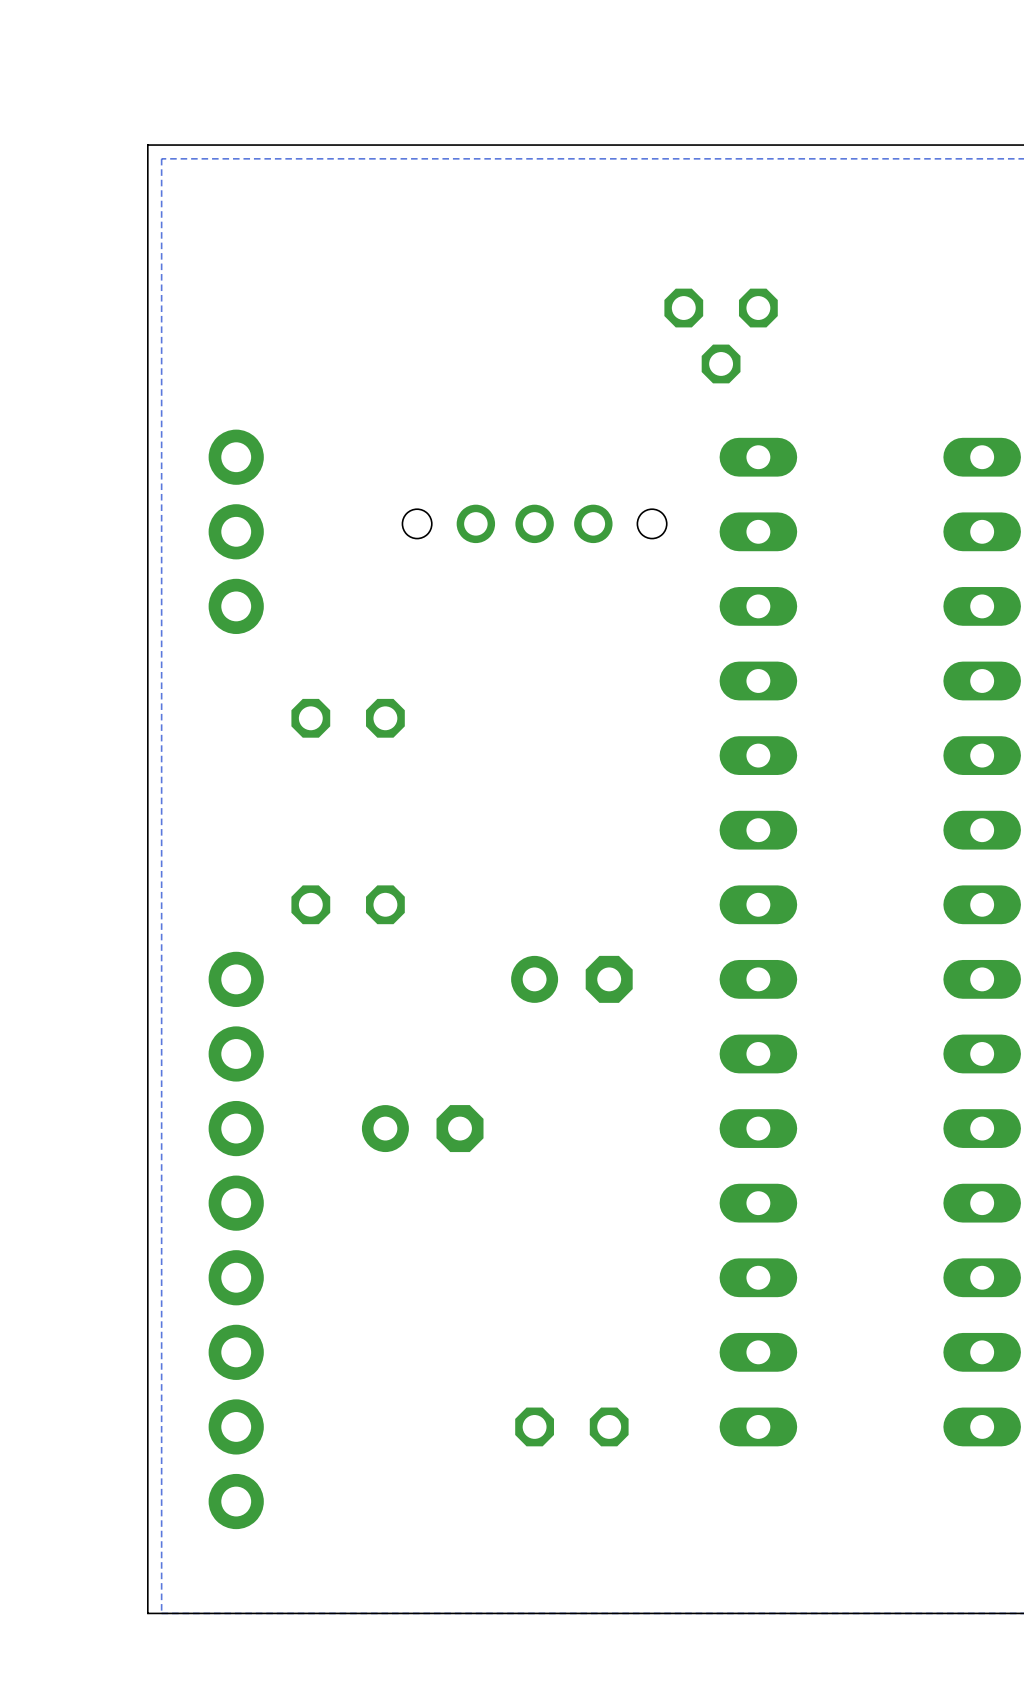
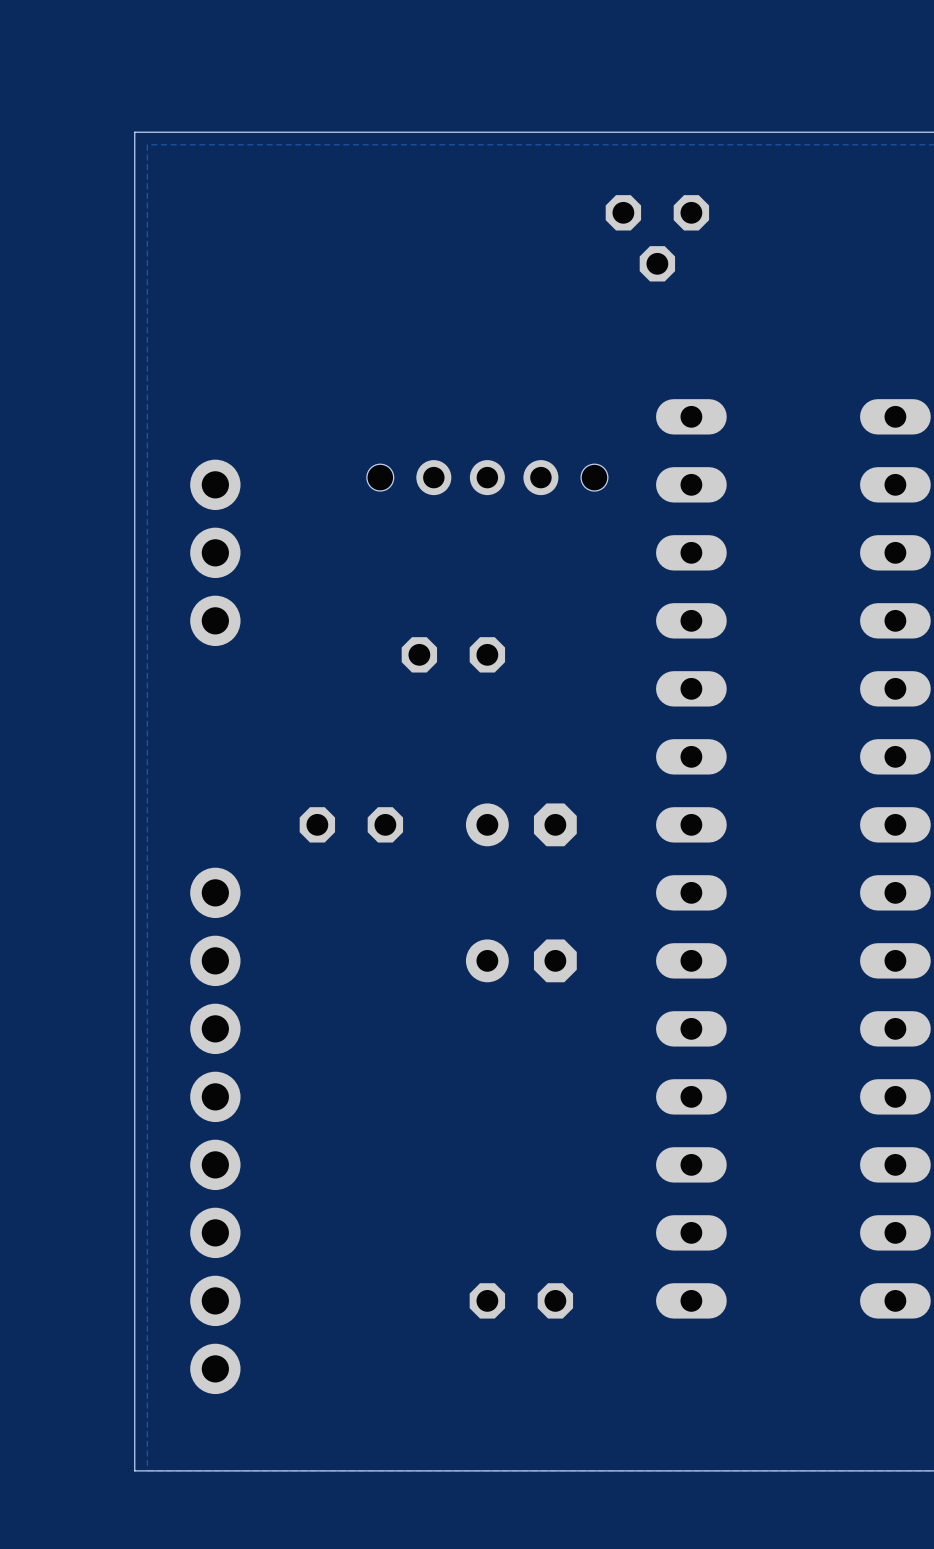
part position: (721, 336) -> (657, 238)
part position: (236, 531) -> (215, 552)
part: (348, 718) -> none
part: none -> (453, 654)
part position: (348, 904) -> (351, 824)
part: none -> (521, 824)
part: (571, 979) -> none
part: none -> (521, 960)
part: (422, 1128) -> none

